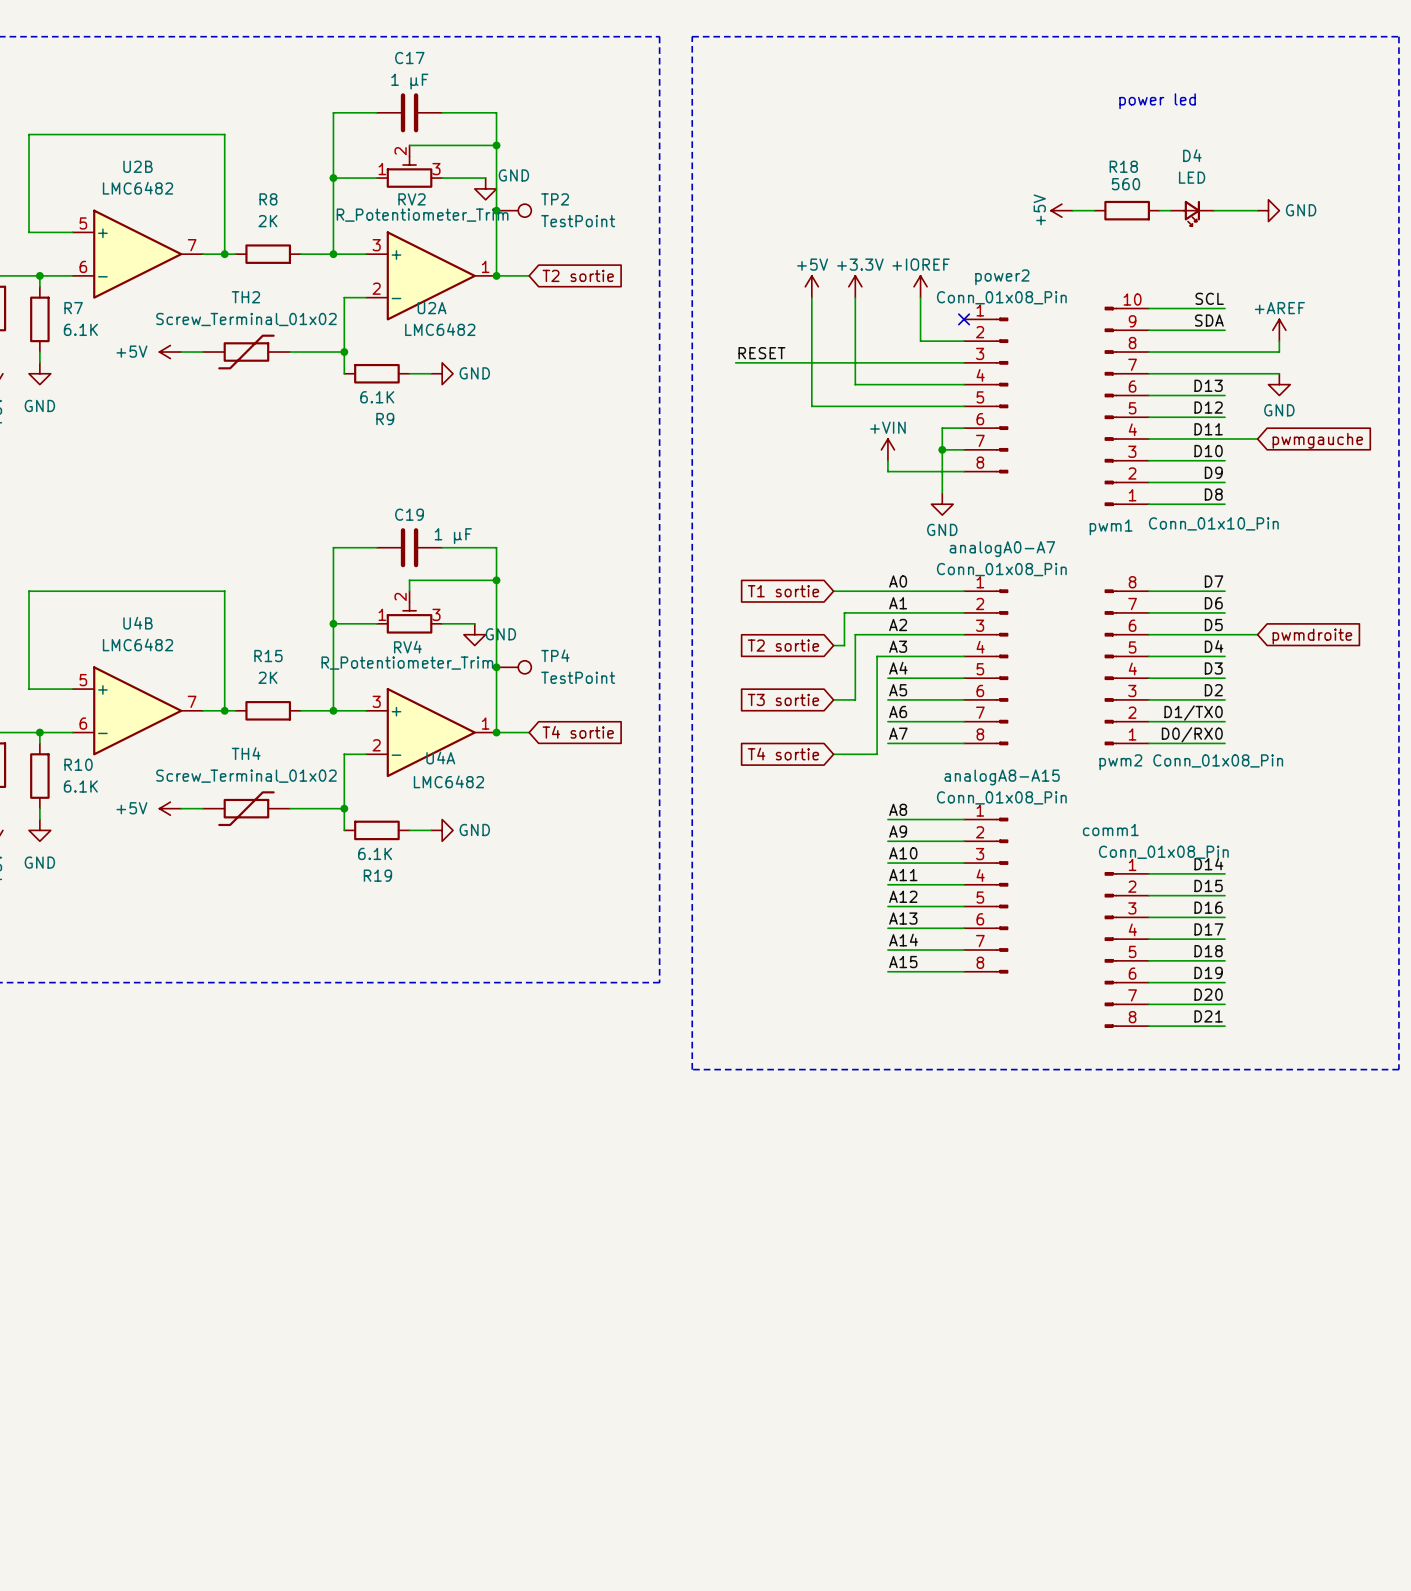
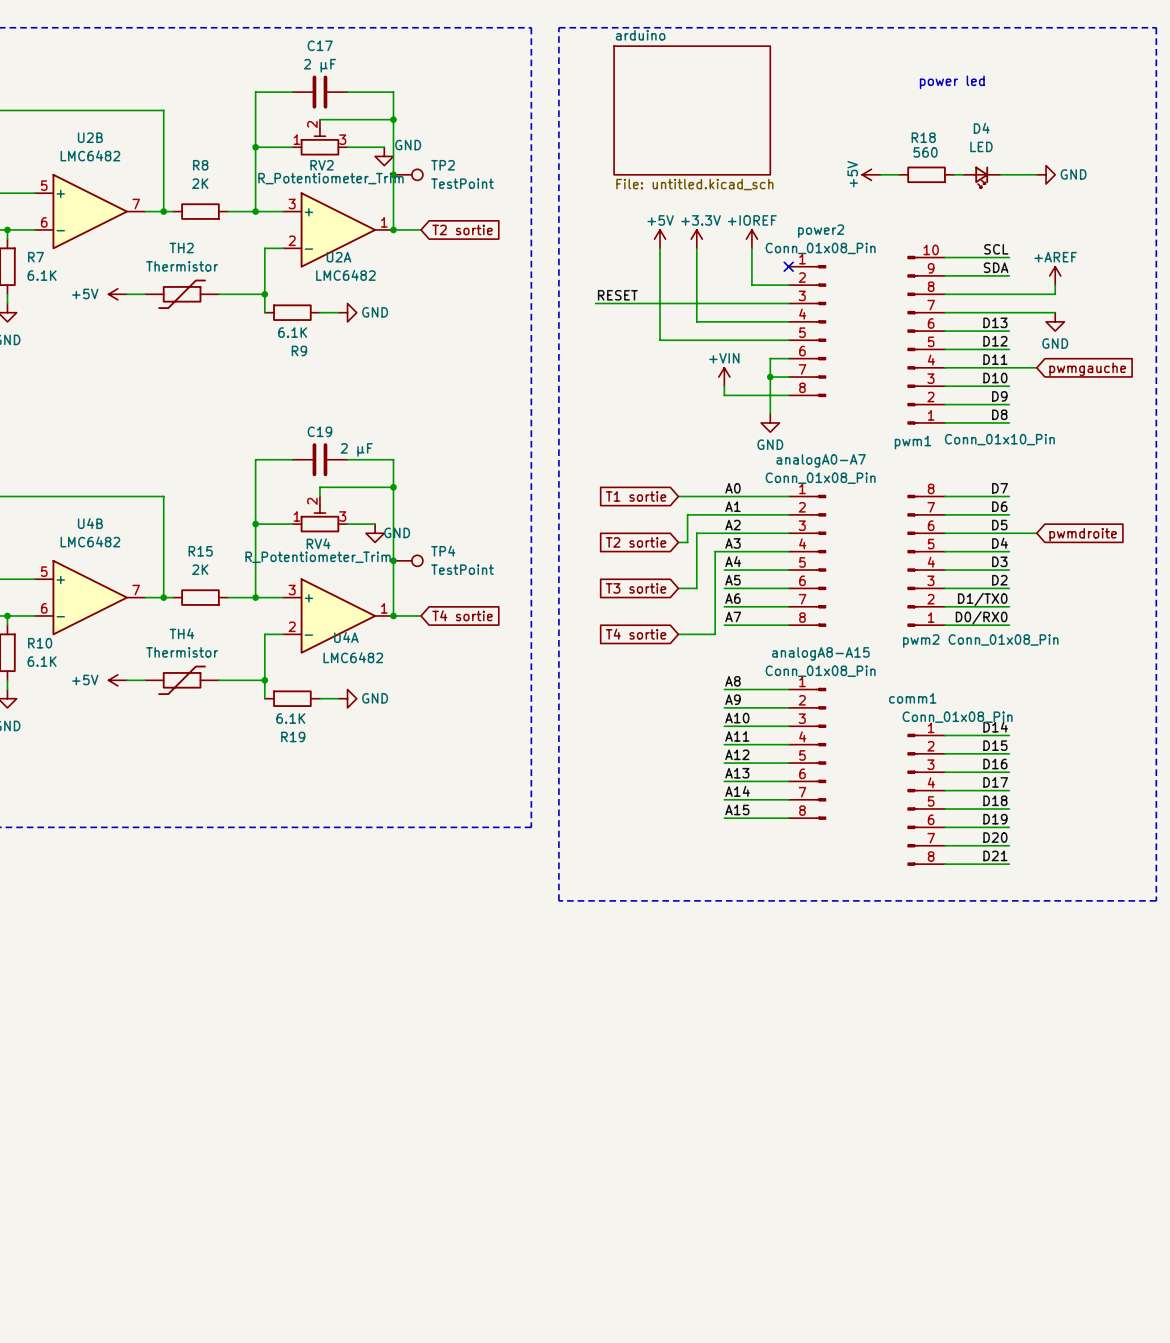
C17 value: 1 μF (409, 81) -> 2 μF (319, 65)
sheet arduino: none -> File: untitled.kicad_sch (692, 110)
TH2 value: Screw_Terminal_01x02 (246, 319) -> Thermistor (182, 266)
C19 value: 1 μF (453, 536) -> 2 μF (356, 449)
TH4 value: Screw_Terminal_01x02 (246, 776) -> Thermistor (182, 652)

